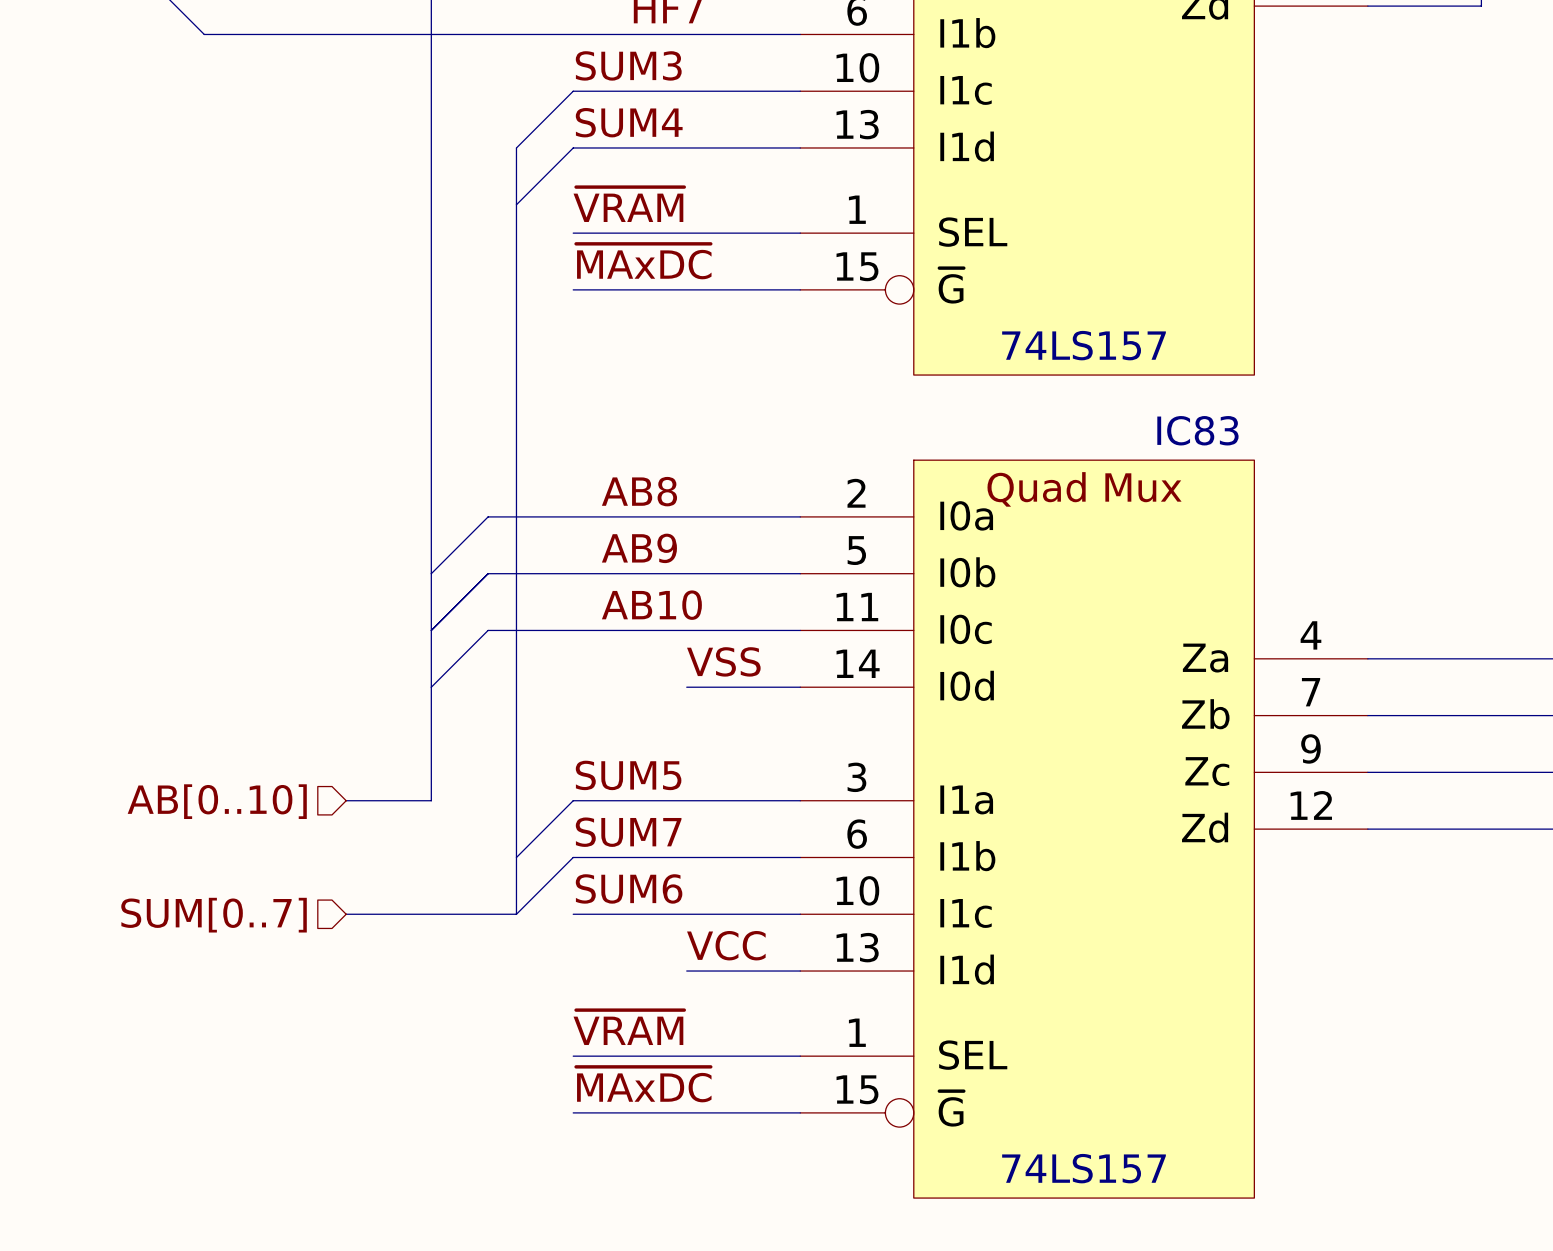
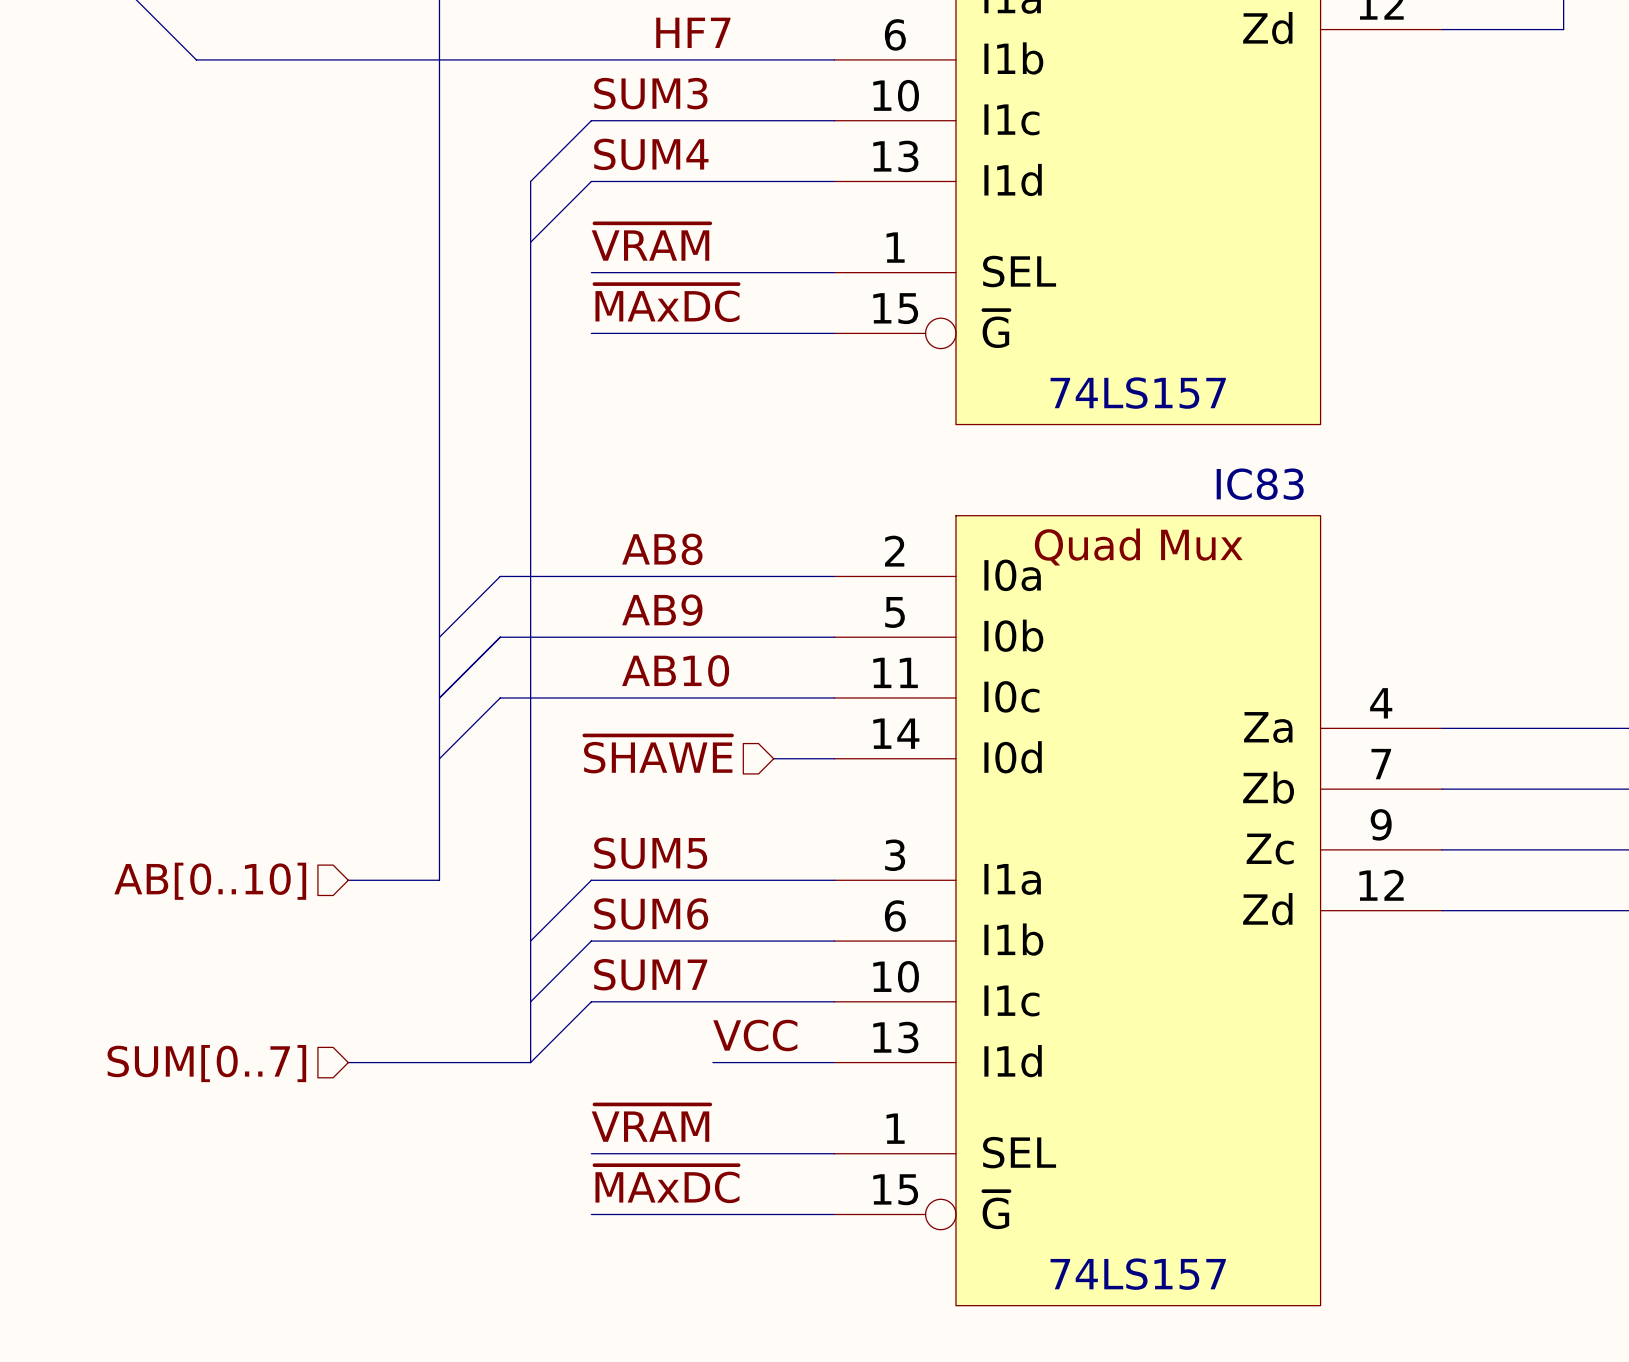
label: VSS (723, 661) -> none
hierarchical label: none -> ~{SHAWE} (658, 754)
wire: (686, 687) (743, 687) -> none
label: SUM7 (628, 832) -> SUM6 (651, 913)
label: SUM6 (629, 888) -> SUM7 (650, 974)
bus: (346, 914) (516, 914) -> (348, 1062) (530, 1062) (530, 1001)
wire: none -> (591, 1001) (530, 1062)
hierarchical label position: SUM[0..7] (214, 915) -> SUM[0..7] (206, 1063)

